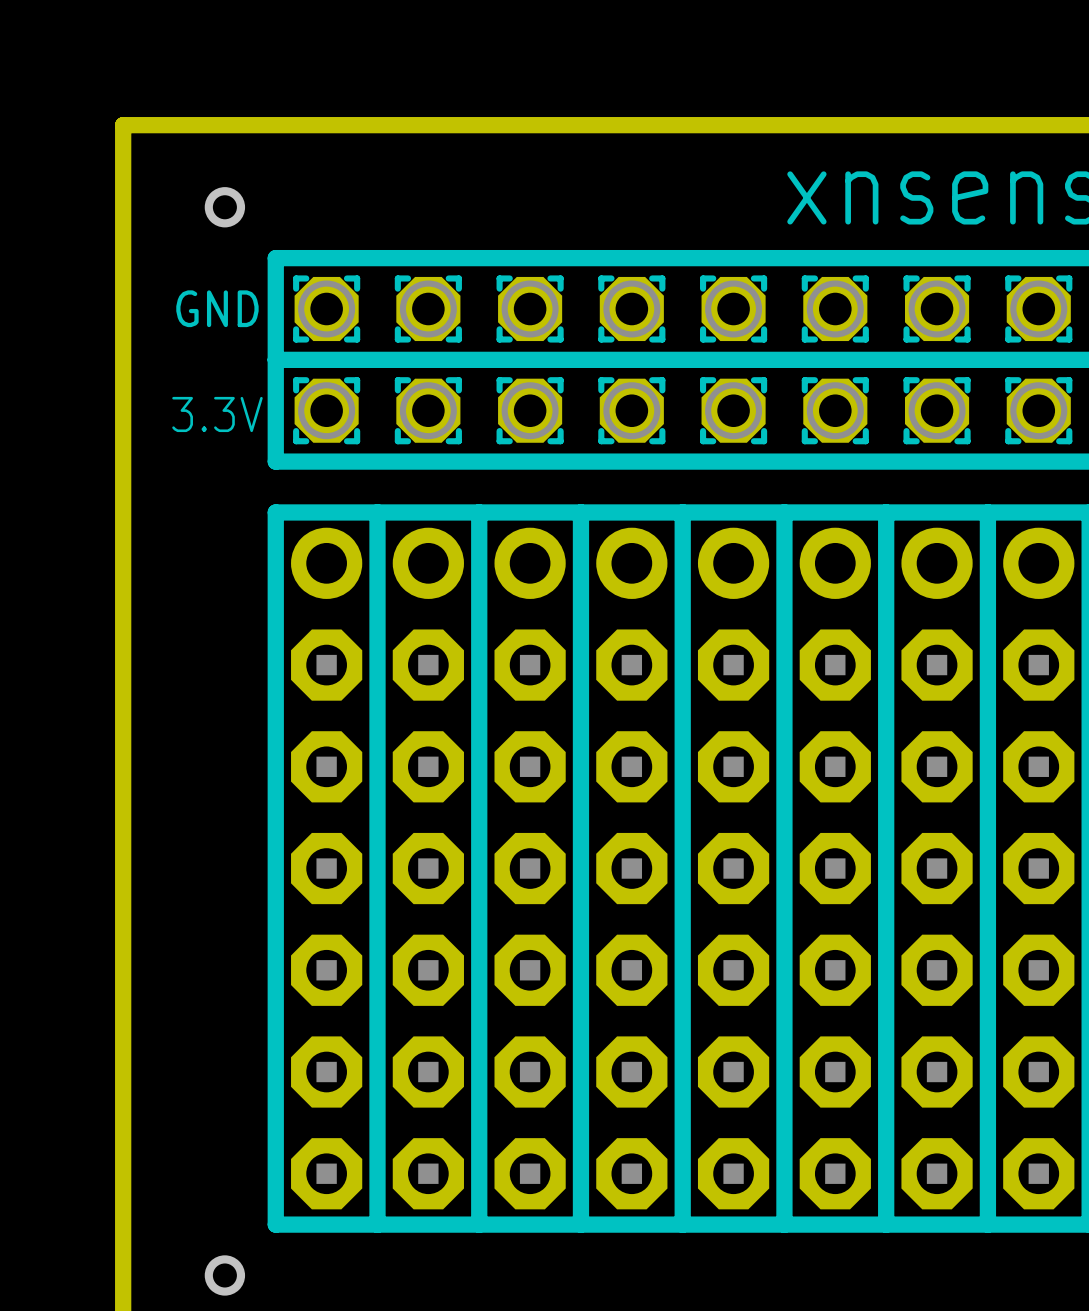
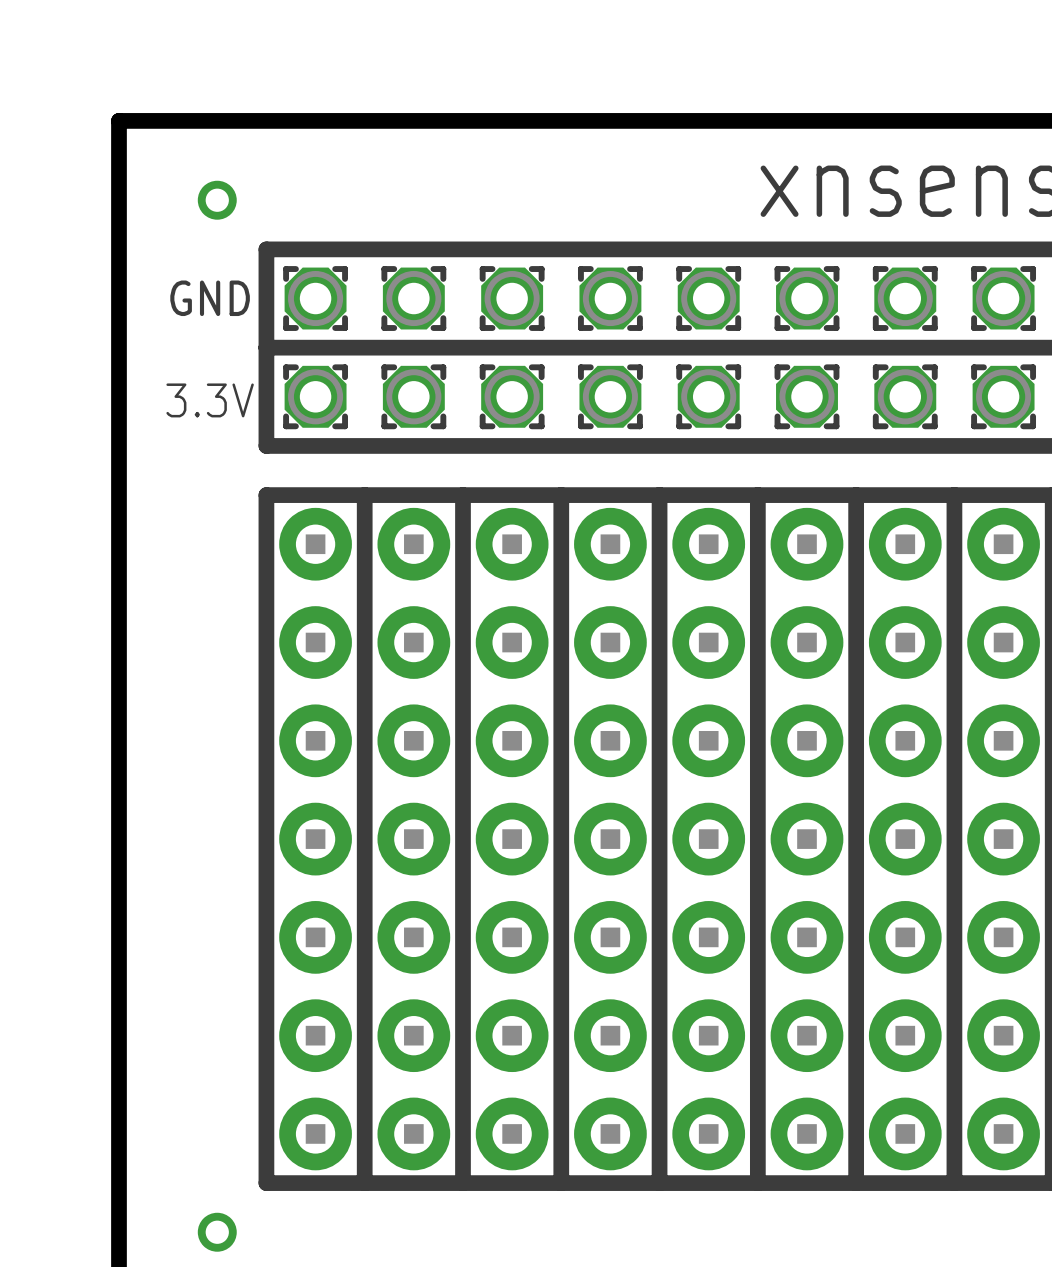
part: (326, 563) -> none
part: (428, 563) -> none
part: (530, 563) -> none
part: (631, 563) -> none
part: (733, 563) -> none
part: (835, 563) -> none
part: (937, 563) -> none
part: (1038, 563) -> none
part: none -> (315, 839)
part: none -> (413, 839)
part: none -> (512, 839)
part: none -> (610, 839)
part: none -> (708, 839)
part: none -> (806, 839)
part: none -> (905, 839)
part: none -> (1003, 839)
part: (326, 919) -> none
part: (428, 919) -> none
part: (530, 919) -> none
part: (631, 919) -> none
part: (733, 919) -> none
part: (835, 919) -> none
part: (937, 919) -> none
part: (1038, 919) -> none

